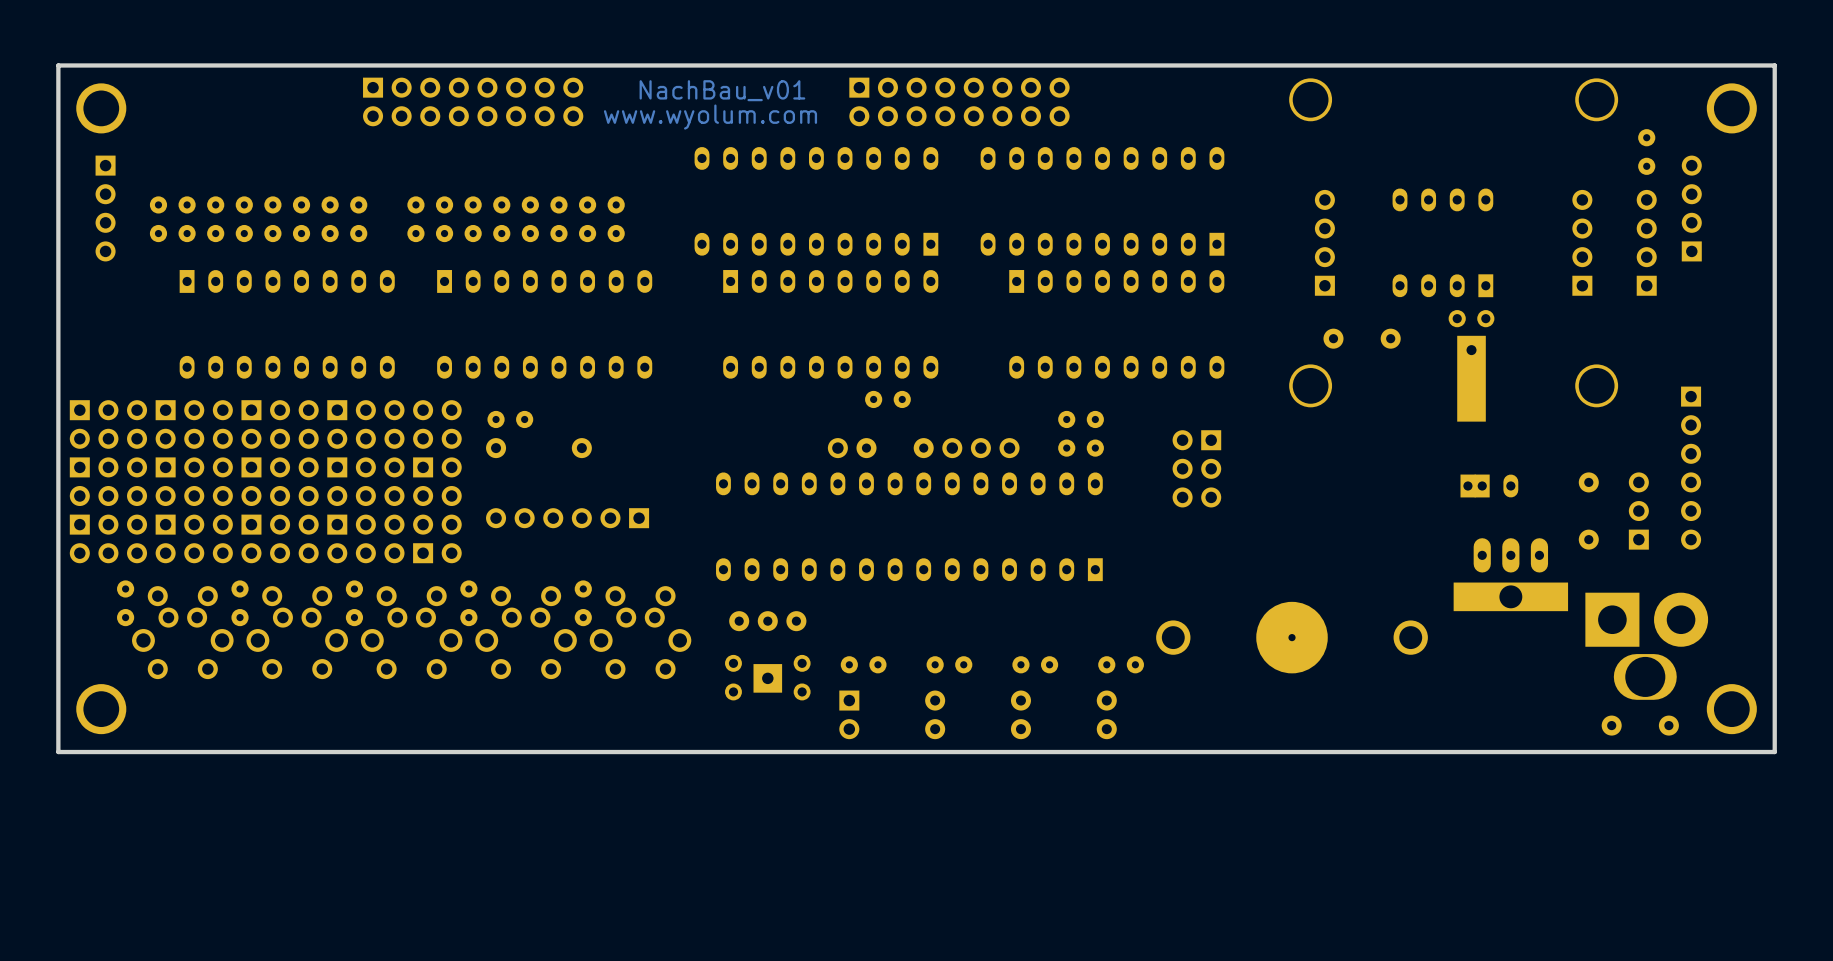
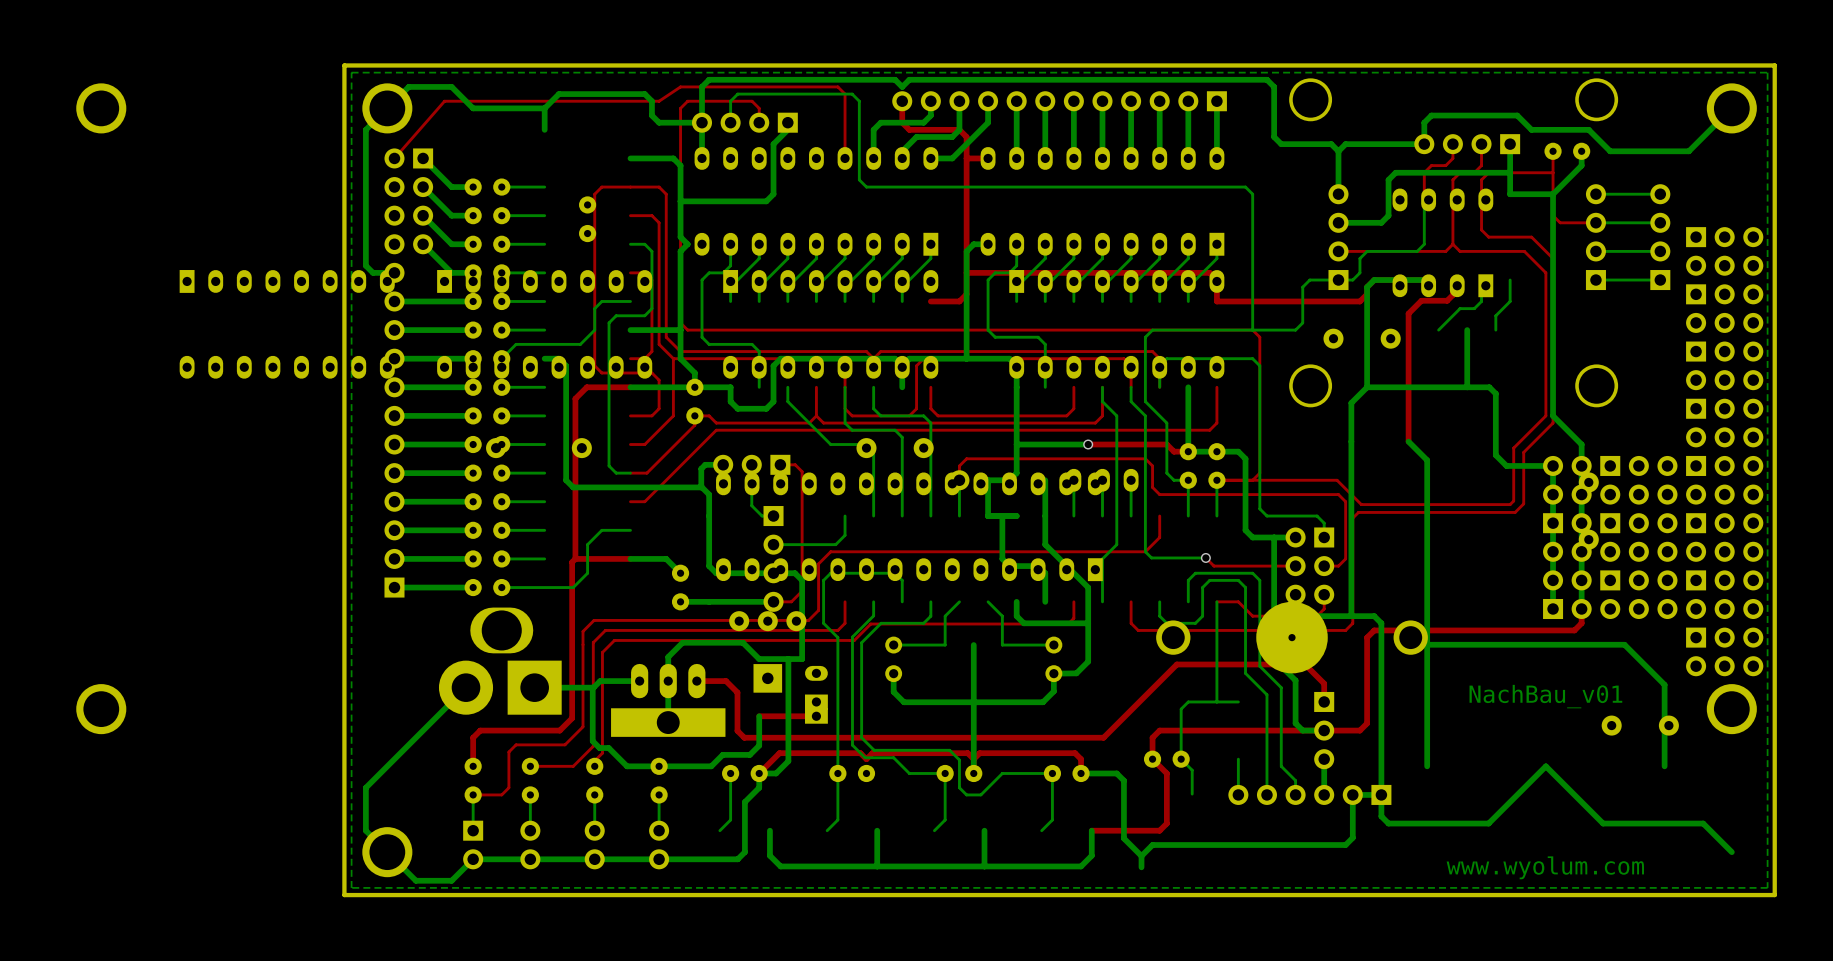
board edge: (344, 65) (58, 65) (58, 752) (1774, 752) -> (344, 65) (344, 895) (1774, 895) (1774, 752)
bottom zone outline: none -> (1767, 72) (351, 72) (351, 887) (1767, 887) (1767, 72)
text: NachBau_v01 (722, 90) -> none
part: (473, 101) -> none
top track: none -> (902, 101) (902, 122) (909, 129) (959, 129) (966, 136) (966, 294) (959, 301) (930, 301)
bottom track: none -> (930, 101) (930, 115) (923, 122) (880, 122) (873, 129) (873, 158)
bottom track: none -> (959, 101) (959, 129) (952, 136) (916, 136) (902, 151) (902, 158)
part: (959, 101) -> none
bottom track: none -> (988, 101) (988, 122) (952, 158) (930, 158)
bottom track: none -> (1016, 101) (1016, 158)
bottom track: none -> (1045, 101) (1045, 158)
part: none -> (1059, 101)
bottom track: none -> (1073, 101) (1073, 158)
bottom track: none -> (1102, 101) (1102, 158)
bottom track: none -> (1131, 101) (1131, 158)
bottom track: none -> (1159, 101) (1159, 158)
bottom track: none -> (1188, 101) (1188, 158)
bottom track: none -> (1216, 101) (1216, 158)
part: none -> (387, 108)
bottom track: none -> (544, 108) (544, 129)
bottom track: none -> (544, 108) (473, 108) (451, 86) (408, 86) (365, 129) (365, 265) (373, 272) (394, 272)
bottom track: none -> (544, 108) (558, 94) (644, 94) (651, 101) (651, 115) (659, 122) (702, 122)
bottom track: none -> (1731, 108) (1688, 151) (1610, 151) (1588, 129) (1531, 129) (1517, 115) (1431, 115) (1424, 122) (1424, 144) (1345, 144) (1338, 151)
text: www.wyolum.com (710, 117) -> none
bottom track: none -> (730, 122) (730, 101) (737, 94) (852, 94) (859, 101) (859, 179) (866, 187) (1245, 187) (1252, 194) (1252, 330)
part: none -> (744, 122)
top track: none -> (759, 122) (759, 108) (752, 101) (687, 101) (680, 108) (680, 322) (687, 330) (1252, 330) (1259, 337) (1259, 473) (1252, 480)
bottom track: none -> (787, 122) (787, 129) (773, 144) (773, 194) (766, 201) (680, 201)
top track: none -> (1452, 144) (1452, 158) (1445, 165) (1431, 165) (1424, 172) (1424, 194)
part: none -> (1467, 144)
top track: none -> (1481, 144) (1481, 165) (1474, 172) (1460, 172) (1452, 179) (1452, 244)
bottom track: none -> (1510, 144) (1510, 194) (1553, 194)
bottom track: none -> (1338, 151) (1331, 144) (1281, 144) (1274, 136) (1274, 86) (1266, 79) (909, 79) (902, 86) (895, 79) (709, 79) (702, 86) (702, 158)
bottom track: none -> (1338, 151) (1338, 194)
top track: none -> (1553, 151) (1553, 215) (1560, 222) (1595, 222)
bottom track: none -> (1581, 151) (1581, 165) (1553, 194)
part rotation: 0° (1646, 152) -> 90° clockwise (1567, 151)
part position: (1646, 152) -> (1567, 151)
bottom track: none -> (423, 158) (451, 187) (473, 187)
bottom track: none -> (630, 158) (673, 158) (680, 165) (680, 237) (687, 244) (680, 251) (680, 358) (694, 373) (694, 387)
top track: none -> (845, 158) (845, 94) (837, 86) (680, 86) (659, 101) (444, 101) (394, 158)
top track: none -> (988, 158) (966, 158)
bottom track: none -> (1510, 172) (1395, 172) (1388, 179) (1388, 215) (1381, 222) (1338, 222)
top track: none -> (1553, 172) (1488, 172) (1481, 179) (1481, 229) (1488, 237) (1531, 237) (1553, 258) (1553, 423) (1523, 452) (1523, 503) (1515, 512) (1358, 512) (1352, 518) (1352, 623) (1345, 630) (1138, 630) (1131, 623) (1131, 601)
bottom track: none -> (423, 187) (451, 215) (473, 215)
part: none -> (487, 187)
bottom track: none -> (544, 187) (501, 187)
bottom track: none -> (1424, 194) (1424, 244) (1417, 251) (1367, 251) (1359, 258) (1359, 272) (1352, 280) (1309, 280) (1302, 287) (1302, 322) (1295, 330) (1152, 330) (1145, 337) (1145, 401) (1166, 423) (1166, 473) (1174, 480) (1188, 480) (1188, 516)
bottom track: none -> (1553, 194) (1553, 415) (1581, 444) (1581, 609)
bottom track: none -> (1660, 194) (1595, 194)
part: none -> (408, 201)
part: (105, 208) -> none
part: (1691, 208) -> none
bottom track: none -> (423, 215) (451, 244) (473, 244)
part: none -> (487, 215)
bottom track: none -> (544, 215) (501, 215)
top track: none -> (630, 215) (651, 215) (659, 222) (659, 344) (673, 358)
part: (158, 219) -> none
part: (187, 219) -> none
part: (215, 219) -> none
part: (244, 219) -> none
part: (272, 219) -> none
part: (301, 219) -> none
part: (330, 219) -> none
part: (358, 219) -> none
part: (415, 219) -> none
part: (444, 219) -> none
part: (473, 219) -> none
part: (501, 219) -> none
part: (530, 219) -> none
part: (558, 219) -> none
part: (616, 219) -> none
bottom track: none -> (1660, 222) (1595, 222)
part position: (1324, 242) -> (1338, 237)
part position: (1582, 242) -> (1595, 237)
part position: (1646, 242) -> (1660, 237)
bottom track: none -> (423, 244) (451, 272) (473, 272)
part: none -> (487, 244)
bottom track: none -> (544, 244) (501, 244)
bottom track: none -> (630, 244) (644, 244) (651, 251) (651, 308) (644, 315) (616, 315) (609, 322) (609, 465) (616, 473) (630, 473)
bottom track: none -> (730, 244) (730, 265) (723, 272) (709, 272) (702, 280) (702, 337) (709, 344) (752, 344) (759, 351) (759, 387)
bottom track: none -> (759, 244) (759, 258) (730, 287) (730, 301)
bottom track: none -> (787, 244) (787, 258) (759, 287) (759, 301)
bottom track: none -> (816, 244) (816, 258) (787, 287) (787, 301)
bottom track: none -> (845, 244) (845, 258) (816, 287) (816, 301)
bottom track: none -> (873, 244) (873, 258) (845, 287) (845, 301)
bottom track: none -> (902, 244) (902, 258) (873, 287) (873, 301)
bottom track: none -> (930, 244) (930, 258) (902, 287) (902, 301)
bottom track: none -> (988, 244) (973, 244) (966, 251) (966, 358)
bottom track: none -> (1016, 244) (1016, 265) (1009, 272) (995, 272) (988, 280) (988, 330) (995, 337) (1038, 337) (1045, 344) (1045, 387)
bottom track: none -> (1045, 244) (1045, 258) (1016, 287) (1016, 301)
bottom track: none -> (1073, 244) (1073, 258) (1045, 287) (1045, 301)
bottom track: none -> (1102, 244) (1102, 258) (1073, 287) (1073, 301)
bottom track: none -> (1131, 244) (1131, 258) (1102, 287) (1102, 301)
bottom track: none -> (1159, 244) (1159, 258) (1131, 287) (1131, 301)
bottom track: none -> (1188, 244) (1188, 258) (1159, 287) (1159, 301)
bottom track: none -> (1216, 244) (1216, 258) (1188, 287) (1188, 301)
top track: none -> (1452, 244) (1445, 251) (1338, 251)
top track: none -> (1452, 244) (1460, 251) (1524, 251) (1545, 272) (1545, 415) (1513, 448) (1513, 501) (1510, 504) (1361, 504) (1337, 480) (1216, 480)
bottom track: none -> (1660, 251) (1595, 251)
part: none -> (1724, 251)
part: none -> (487, 272)
bottom track: none -> (544, 272) (501, 272)
top track: none -> (630, 272) (644, 272) (651, 280) (651, 351) (644, 358) (630, 358)
top track: none -> (966, 272) (1209, 272) (1216, 280) (1216, 301) (1359, 301) (1367, 294) (1367, 287) (1374, 280) (1424, 280)
bottom track: none -> (1424, 280) (1374, 280) (1367, 287) (1367, 387)
top track: none -> (1452, 280) (1452, 295) (1447, 300) (1421, 300) (1408, 313) (1408, 441)
bottom track: none -> (1481, 280) (1481, 301) (1474, 308) (1460, 308) (1438, 330)
bottom track: none -> (1510, 280) (1510, 301) (1495, 315) (1495, 330)
bottom track: none -> (1660, 280) (1595, 280)
bottom track: none -> (473, 301) (394, 301)
part: none -> (487, 301)
bottom track: none -> (544, 301) (501, 301)
bottom track: none -> (630, 301) (601, 301) (594, 308) (594, 330) (580, 344) (516, 344) (501, 358)
part: none -> (1724, 308)
bottom track: none -> (473, 330) (394, 330)
part: none -> (487, 330)
bottom track: none -> (544, 330) (501, 330)
bottom track: none -> (680, 330) (630, 330)
bottom track: none -> (1467, 330) (1467, 387)
bottom track: none -> (473, 358) (394, 358)
part: none -> (487, 358)
bottom track: none -> (544, 358) (558, 358) (566, 365) (566, 480) (573, 487) (702, 487) (709, 494) (709, 566) (716, 573) (794, 573) (802, 580) (802, 659) (759, 659) (742, 642) (682, 642) (668, 657) (668, 722)
top track: none -> (673, 358) (673, 415) (644, 444) (630, 444)
top track: none -> (673, 358) (837, 358) (845, 365) (845, 408) (852, 415) (909, 415) (916, 408) (916, 365) (923, 358) (1123, 358) (1131, 365) (1131, 387)
bottom track: none -> (902, 365) (902, 387)
bottom track: none -> (902, 365) (895, 358) (780, 358) (773, 365) (773, 401) (766, 408) (737, 408) (730, 401) (730, 387) (630, 387)
bottom track: none -> (902, 365) (909, 358) (1009, 358) (1016, 365) (1016, 473) (1009, 480) (988, 480) (988, 516) (1016, 516)
part: (1471, 365) -> none
part: none -> (1724, 365)
bottom track: none -> (473, 387) (394, 387)
part: none -> (487, 387)
bottom track: none -> (544, 387) (501, 387)
top track: none -> (630, 387) (586, 387) (575, 398) (575, 558)
bottom track: none -> (787, 387) (787, 401) (830, 444) (866, 444) (873, 451) (873, 516)
top track: none -> (816, 387) (816, 415)
bottom track: none -> (845, 387) (845, 423) (852, 430) (895, 430) (902, 437) (902, 516)
bottom track: none -> (873, 387) (873, 408) (880, 415) (923, 415) (930, 423) (930, 516)
top track: none -> (1073, 387) (1073, 408) (1066, 415) (938, 415) (930, 408) (930, 387)
bottom track: none -> (1102, 387) (1102, 401) (1116, 415) (1116, 544) (1102, 558) (1102, 601)
top track: none -> (1102, 387) (1102, 415) (1095, 423) (823, 423) (816, 415)
bottom track: none -> (1131, 387) (1131, 401) (1145, 415) (1145, 551) (1151, 557) (1205, 557)
bottom track: none -> (1159, 387) (1159, 365) (1166, 358) (1252, 358) (1259, 365) (1259, 508) (1266, 516) (1317, 516) (1324, 523) (1324, 537)
top track: none -> (1159, 387) (1159, 358) (1152, 351) (880, 351) (873, 358) (866, 351) (680, 351) (666, 337) (666, 194) (659, 187) (601, 187) (594, 194) (594, 365) (601, 373) (651, 373) (659, 380) (659, 408) (651, 415) (630, 415)
bottom track: none -> (1188, 387) (1188, 451) (1238, 451) (1245, 458) (1245, 530) (1252, 537) (1295, 537)
top track: none -> (1216, 387) (1216, 423) (1209, 430) (716, 430) (644, 501) (630, 501)
bottom track: none -> (1367, 387) (1489, 387) (1495, 393) (1495, 455) (1506, 465) (1553, 465) (1553, 609)
bottom track: none -> (1367, 387) (1351, 403) (1351, 616)
part: (887, 399) -> none
part: none -> (694, 401)
bottom track: none -> (473, 415) (394, 415)
part: none -> (487, 415)
bottom track: none -> (544, 415) (501, 415)
top track: none -> (816, 415) (809, 423) (716, 423) (709, 415) (694, 415) (694, 425) (646, 473) (630, 473)
part: (510, 419) -> none
part: none -> (1724, 423)
part: (108, 424) -> none
part: (194, 424) -> none
part: (280, 424) -> none
part: (365, 424) -> none
part: none -> (394, 430)
part footprint: [1172, 430, 1222, 508] -> [1179, 443, 1197, 489]
part: (1066, 433) -> none
part: (1095, 433) -> none
part: (437, 438) -> none
bottom track: none -> (1408, 441) (1427, 460) (1427, 766)
bottom track: none -> (473, 444) (394, 444)
part: none -> (487, 444)
bottom track: none -> (544, 444) (501, 444)
bottom track: none -> (1088, 444) (1016, 444)
top track: none -> (1088, 444) (1166, 444) (1174, 451) (1188, 451)
via: none -> (1088, 444)
part: (837, 448) -> none
part: (952, 448) -> none
part: (980, 448) -> none
part: (1009, 448) -> none
bottom track: none -> (723, 464) (705, 464) (701, 468) (701, 487)
bottom track: none -> (751, 464) (751, 505) (762, 516) (773, 516)
part: none -> (751, 464)
top track: none -> (780, 464) (795, 464) (802, 471) (802, 591) (791, 601) (773, 601)
part: none -> (1216, 465)
part: (1691, 468) -> none
bottom track: none -> (473, 473) (394, 473)
part: none -> (487, 473)
bottom track: none -> (544, 473) (501, 473)
bottom track: none -> (959, 480) (959, 516)
top track: none -> (959, 480) (959, 465) (966, 458) (1145, 458) (1152, 465) (1152, 487) (1159, 494) (1338, 494) (1345, 501) (1345, 558) (1338, 566) (1324, 566)
part: none -> (959, 480)
bottom track: none -> (1045, 480) (1045, 544) (1088, 587) (1088, 661) (1076, 673) (1053, 673) (1053, 691) (1042, 702) (903, 702) (893, 691) (893, 673)
bottom track: none -> (1073, 480) (1073, 516)
part: none -> (1073, 480)
bottom track: none -> (1102, 480) (1102, 516)
part: none -> (1102, 480)
bottom track: none -> (1131, 480) (1131, 516)
part: none -> (1131, 480)
bottom track: none -> (1216, 480) (1216, 516)
part: none -> (1638, 480)
part: none -> (1724, 480)
part: (108, 481) -> none
part: (194, 481) -> none
part: (280, 481) -> none
part: (365, 481) -> none
part: (1489, 485) -> none
part: none -> (1567, 494)
bottom track: none -> (473, 501) (394, 501)
part: none -> (487, 501)
bottom track: none -> (544, 501) (501, 501)
part: (1638, 511) -> none
bottom track: none -> (845, 516) (845, 535) (835, 544) (773, 544)
bottom track: none -> (1002, 516) (1002, 558) (1009, 566) (1038, 566) (1045, 573) (1045, 601)
top track: none -> (1159, 516) (1159, 537) (1145, 551) (830, 551) (818, 563) (818, 610) (808, 620) (594, 620) (583, 631) (583, 726) (564, 744) (516, 744) (508, 752) (508, 787) (501, 794) (473, 794)
part: (567, 518) -> none
part: (437, 524) -> none
bottom track: none -> (473, 530) (394, 530)
part: none -> (487, 530)
bottom track: none -> (544, 530) (501, 530)
bottom track: none -> (630, 530) (601, 530) (587, 544) (587, 573) (573, 587) (501, 587)
bottom track: none -> (1274, 537) (1274, 659) (1295, 680) (1295, 723) (1302, 730) (1324, 730)
part: none -> (1638, 537)
part: none -> (1724, 537)
part: (108, 538) -> none
part: (194, 538) -> none
part: (280, 538) -> none
part: (365, 538) -> none
top track: none -> (1205, 557) (1214, 566) (1295, 566)
via: none -> (1205, 557)
bottom track: none -> (473, 558) (394, 558)
part: none -> (487, 558)
bottom track: none -> (544, 558) (501, 558)
top track: none -> (575, 558) (572, 562) (572, 718) (559, 730) (480, 730) (473, 737) (473, 766)
bottom track: none -> (630, 558) (666, 558) (680, 573)
top track: none -> (630, 558) (575, 558)
part: none -> (773, 558)
part: none -> (1309, 566)
part: (1510, 574) -> none
part: none -> (1567, 580)
bottom track: none -> (473, 587) (394, 587)
part: none -> (487, 587)
part: none -> (680, 587)
bottom track: none -> (1295, 594) (1295, 601) (1309, 616) (1374, 616) (1381, 623) (1381, 816) (1388, 823) (1488, 823) (1545, 766) (1603, 823) (1703, 823) (1731, 852)
top track: none -> (1324, 594) (1324, 609) (1317, 616) (1252, 616) (1238, 601) (1216, 601)
part: none -> (1638, 594)
part: none -> (1724, 594)
bottom track: none -> (773, 601) (680, 601)
top track: none -> (845, 601) (845, 623) (837, 630) (605, 630) (593, 642) (593, 746) (573, 766) (530, 766)
bottom track: none -> (873, 601) (873, 615) (852, 637) (852, 745) (865, 757) (893, 757) (909, 773) (945, 773) (945, 819) (934, 830)
bottom track: none -> (902, 601) (902, 580) (895, 573) (830, 573) (823, 580) (823, 623) (837, 637) (837, 819) (827, 830)
bottom track: none -> (930, 601) (930, 616) (923, 623) (881, 623) (861, 642) (861, 737) (874, 750) (949, 750) (959, 760) (959, 787) (966, 794) (980, 794) (1002, 773) (1052, 773) (1052, 819) (1041, 830)
bottom track: none -> (959, 601) (945, 616) (945, 645) (893, 645)
bottom track: none -> (988, 601) (1002, 616) (1002, 645) (1053, 645)
bottom track: none -> (1016, 601) (1016, 616) (1023, 623) (1088, 623)
top track: none -> (1073, 601) (1073, 618) (1068, 624) (870, 624) (854, 640) (614, 640) (602, 652) (602, 753) (594, 760) (594, 766)
bottom track: none -> (1159, 601) (1159, 616) (1166, 623) (1195, 623) (1202, 616) (1202, 587) (1209, 580) (1238, 580) (1245, 587) (1245, 673) (1266, 694) (1266, 794)
bottom track: none -> (1188, 601) (1188, 580) (1195, 573) (1252, 573) (1259, 580) (1259, 666) (1281, 687) (1281, 766) (1295, 780) (1295, 794)
bottom track: none -> (1216, 601) (1216, 701)
part: (125, 603) -> none
part: (240, 603) -> none
part: (354, 603) -> none
part: (468, 603) -> none
part: (583, 603) -> none
top track: none -> (1581, 609) (1581, 623) (1574, 630) (1374, 630) (1367, 637) (1367, 723) (1359, 730) (1159, 730) (1152, 737) (1152, 759) (1166, 773) (1166, 823) (1159, 830) (1091, 830)
part: (182, 632) -> none
part: (297, 632) -> none
part: (411, 632) -> none
part: (526, 632) -> none
part: (640, 632) -> none
bottom track: none -> (1427, 644) (1624, 644) (1664, 684) (1664, 766)
bottom track: none -> (973, 645) (973, 773)
part: (1646, 646) -> none
part: none -> (1724, 651)
bottom track: none -> (788, 659) (788, 761) (776, 773) (759, 773) (759, 787) (744, 802) (744, 852) (737, 859) (473, 859) (451, 880) (415, 880) (365, 830) (365, 787) (466, 687)
part: none -> (893, 659)
part: none -> (1053, 659)
part: none -> (500, 661)
part: (863, 664) -> none
part: (949, 664) -> none
part: (1035, 664) -> none
part: (1121, 664) -> none
part: (733, 677) -> none
part: (802, 677) -> none
bottom track: none -> (639, 681) (600, 681) (593, 687) (534, 687)
top track: none -> (696, 681) (726, 681) (737, 692) (737, 730) (744, 737) (1103, 737) (1176, 664) (1305, 664) (1324, 683) (1324, 701)
bottom track: none -> (592, 687) (592, 741) (599, 748) (608, 748) (627, 766) (711, 766) (722, 754) (749, 754) (759, 745) (759, 716)
part: none -> (816, 694)
text: none -> NachBau_v01 (1545, 696)
part: none -> (668, 700)
bottom track: none -> (1238, 701) (1188, 701) (1181, 709) (1181, 759) (1192, 770) (1192, 794)
part: (849, 714) -> none
part: (935, 714) -> none
part: (1020, 714) -> none
part: (1106, 714) -> none
top track: none -> (816, 716) (759, 716)
part: none -> (1324, 730)
top track: none -> (973, 759) (967, 753) (872, 753) (866, 759) (860, 753) (779, 753) (759, 773)
top track: none -> (973, 759) (979, 753) (1075, 753) (1081, 759) (1081, 773)
part: none -> (1166, 759)
bottom track: none -> (1238, 759) (1238, 794)
bottom track: none -> (1324, 759) (1324, 794)
bottom track: none -> (730, 773) (730, 819) (719, 830)
part: none -> (744, 773)
part: none -> (852, 773)
part: none -> (959, 773)
part: none -> (1066, 773)
bottom track: none -> (1081, 773) (1116, 773) (1123, 780) (1123, 838) (1141, 856)
part: none -> (473, 780)
part: none -> (530, 780)
part: none -> (594, 780)
part: none -> (659, 780)
bottom track: none -> (473, 794) (473, 830)
bottom track: none -> (530, 794) (530, 830)
bottom track: none -> (594, 794) (594, 830)
bottom track: none -> (659, 794) (659, 830)
part: none -> (1309, 794)
bottom track: none -> (1381, 794) (1352, 794) (1352, 837) (1345, 845) (1152, 845) (1141, 856)
bottom track: none -> (877, 830) (877, 866)
bottom track: none -> (984, 830) (984, 866)
bottom track: none -> (1091, 830) (1091, 855) (1081, 866) (780, 866) (769, 855) (769, 830)
part: none -> (473, 845)
part: none -> (530, 845)
part: none -> (594, 845)
part: none -> (659, 845)
part: none -> (387, 852)
bottom track: none -> (1141, 856) (1141, 867)
text: none -> www.wyolum.com (1545, 867)

